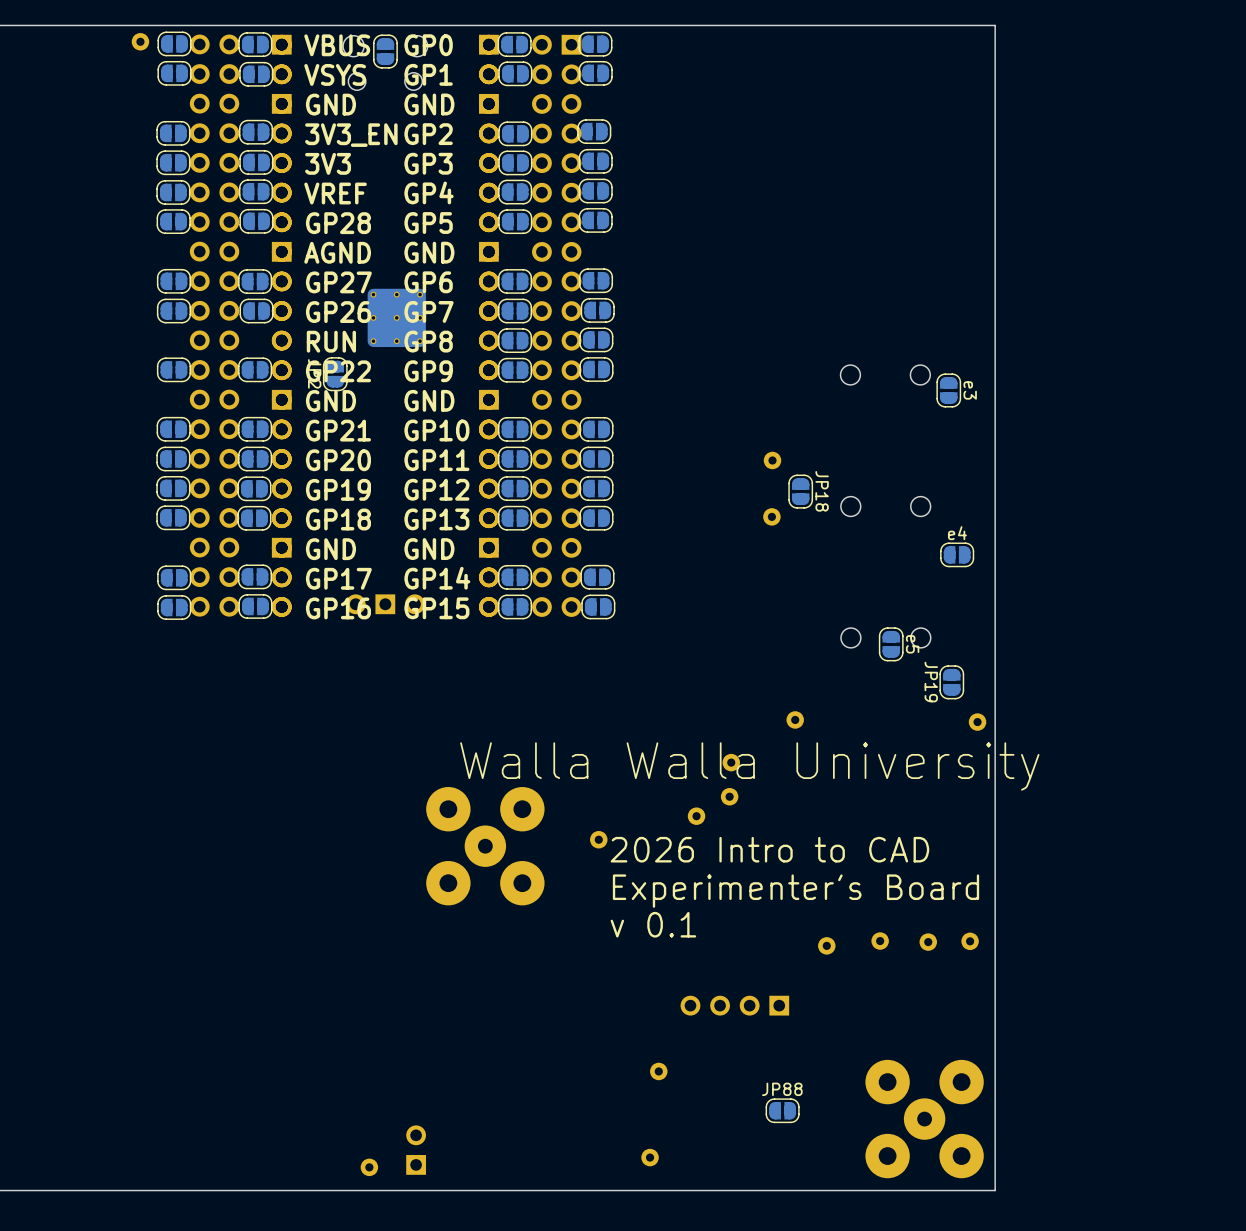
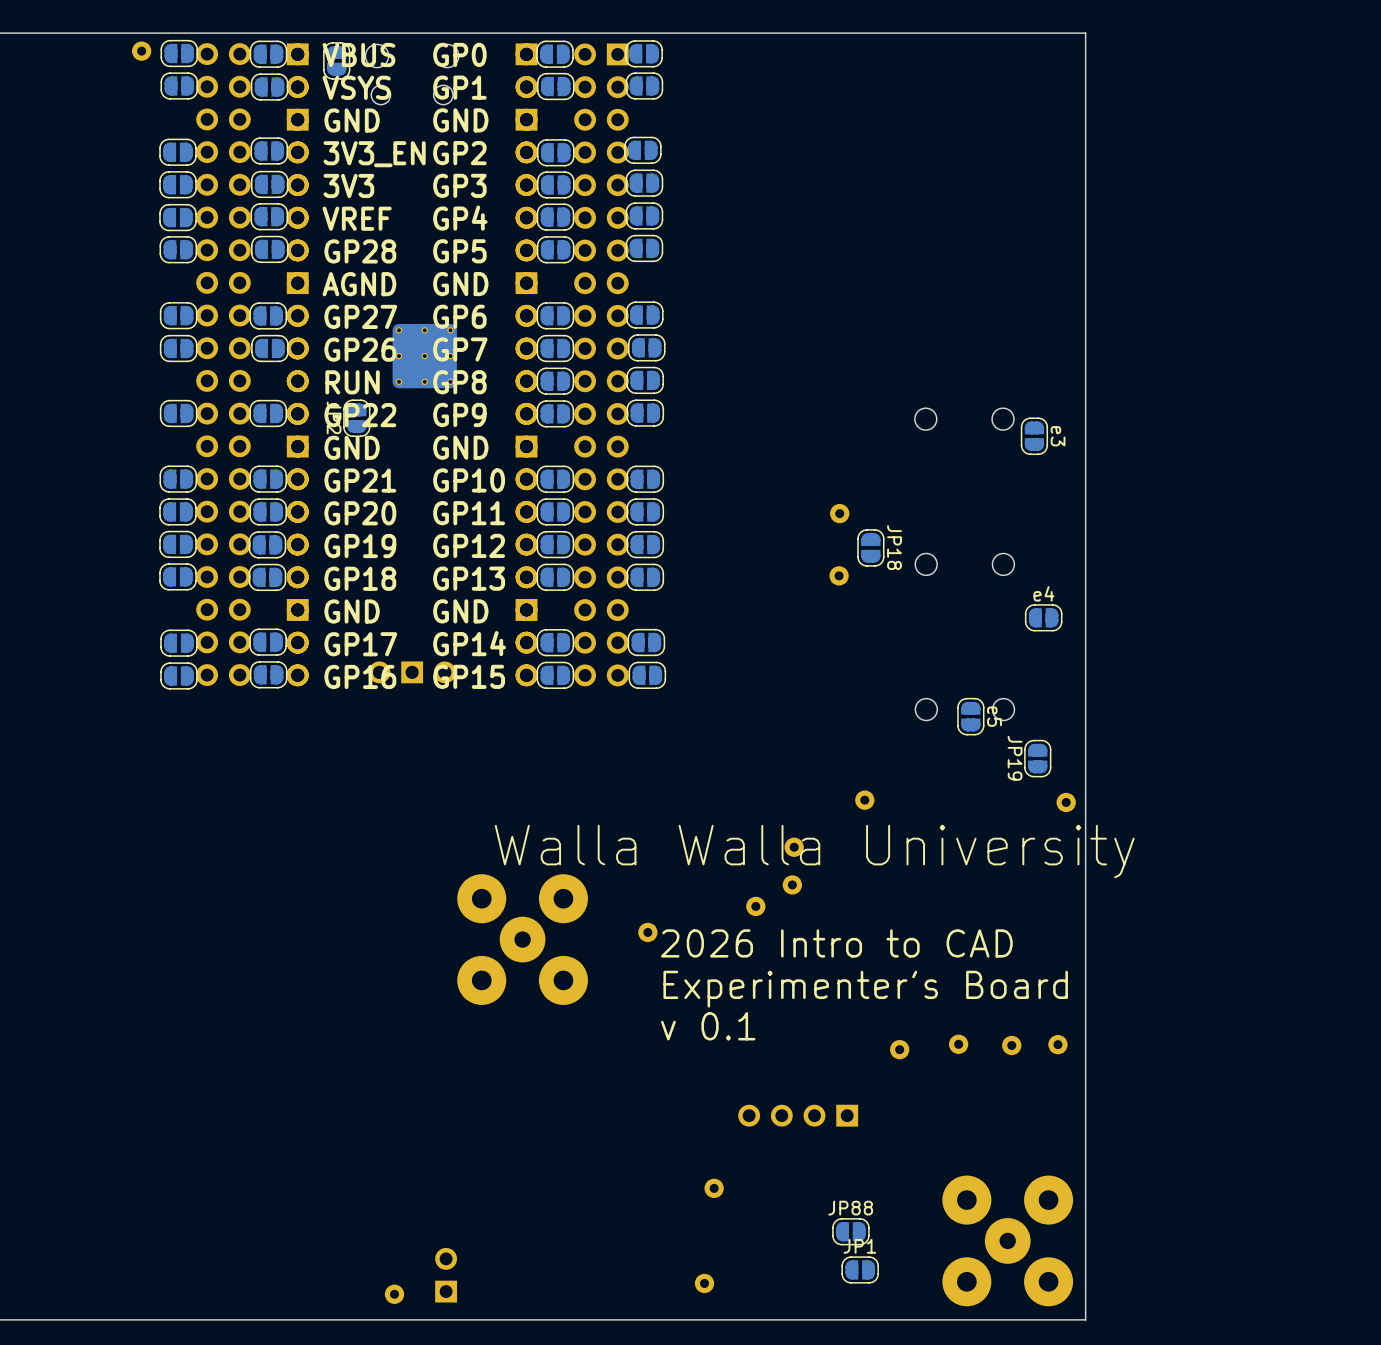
part position: (385, 51) -> (336, 60)
JP1: none -> (860, 1269)

